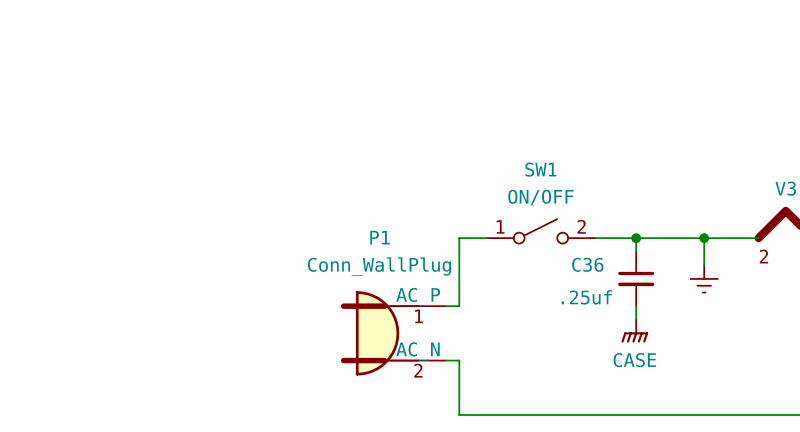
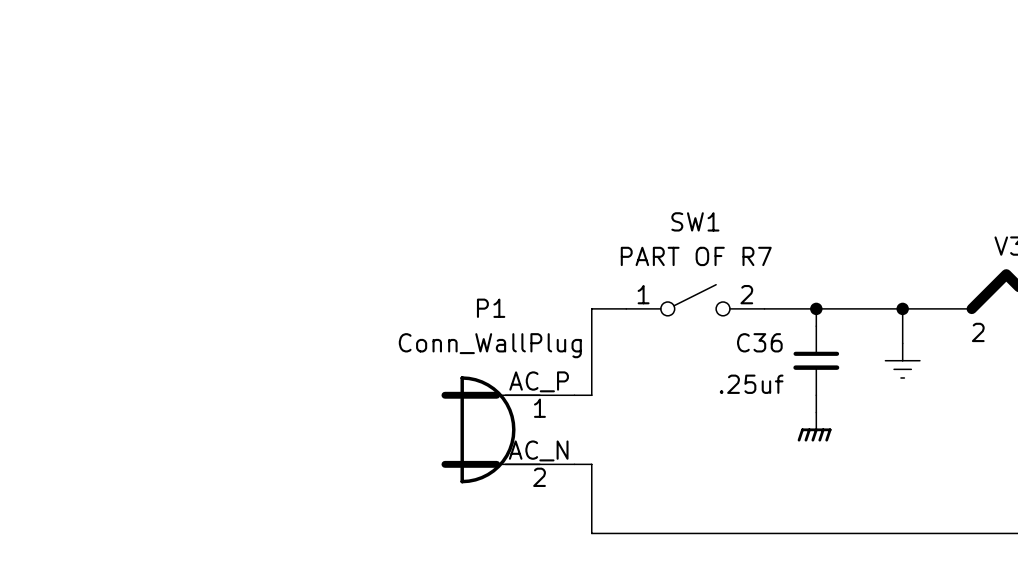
SW1 value: ON/OFF (540, 197) -> PART OF R7 (696, 256)
power symbol text: CASE (634, 360) -> none

